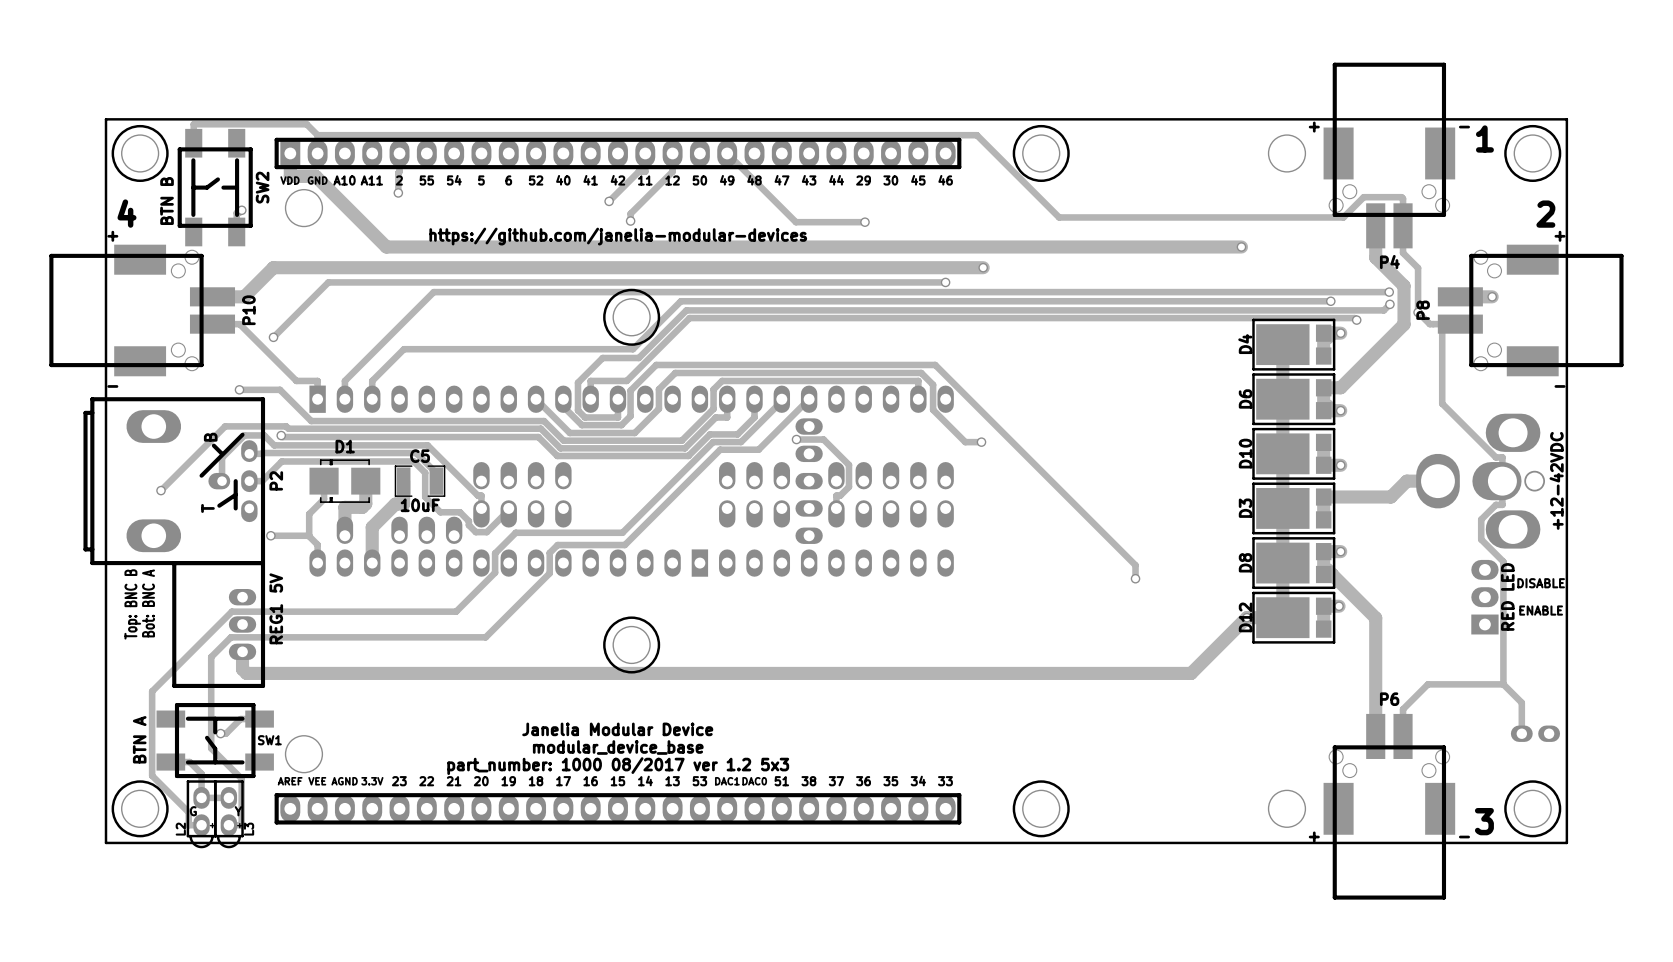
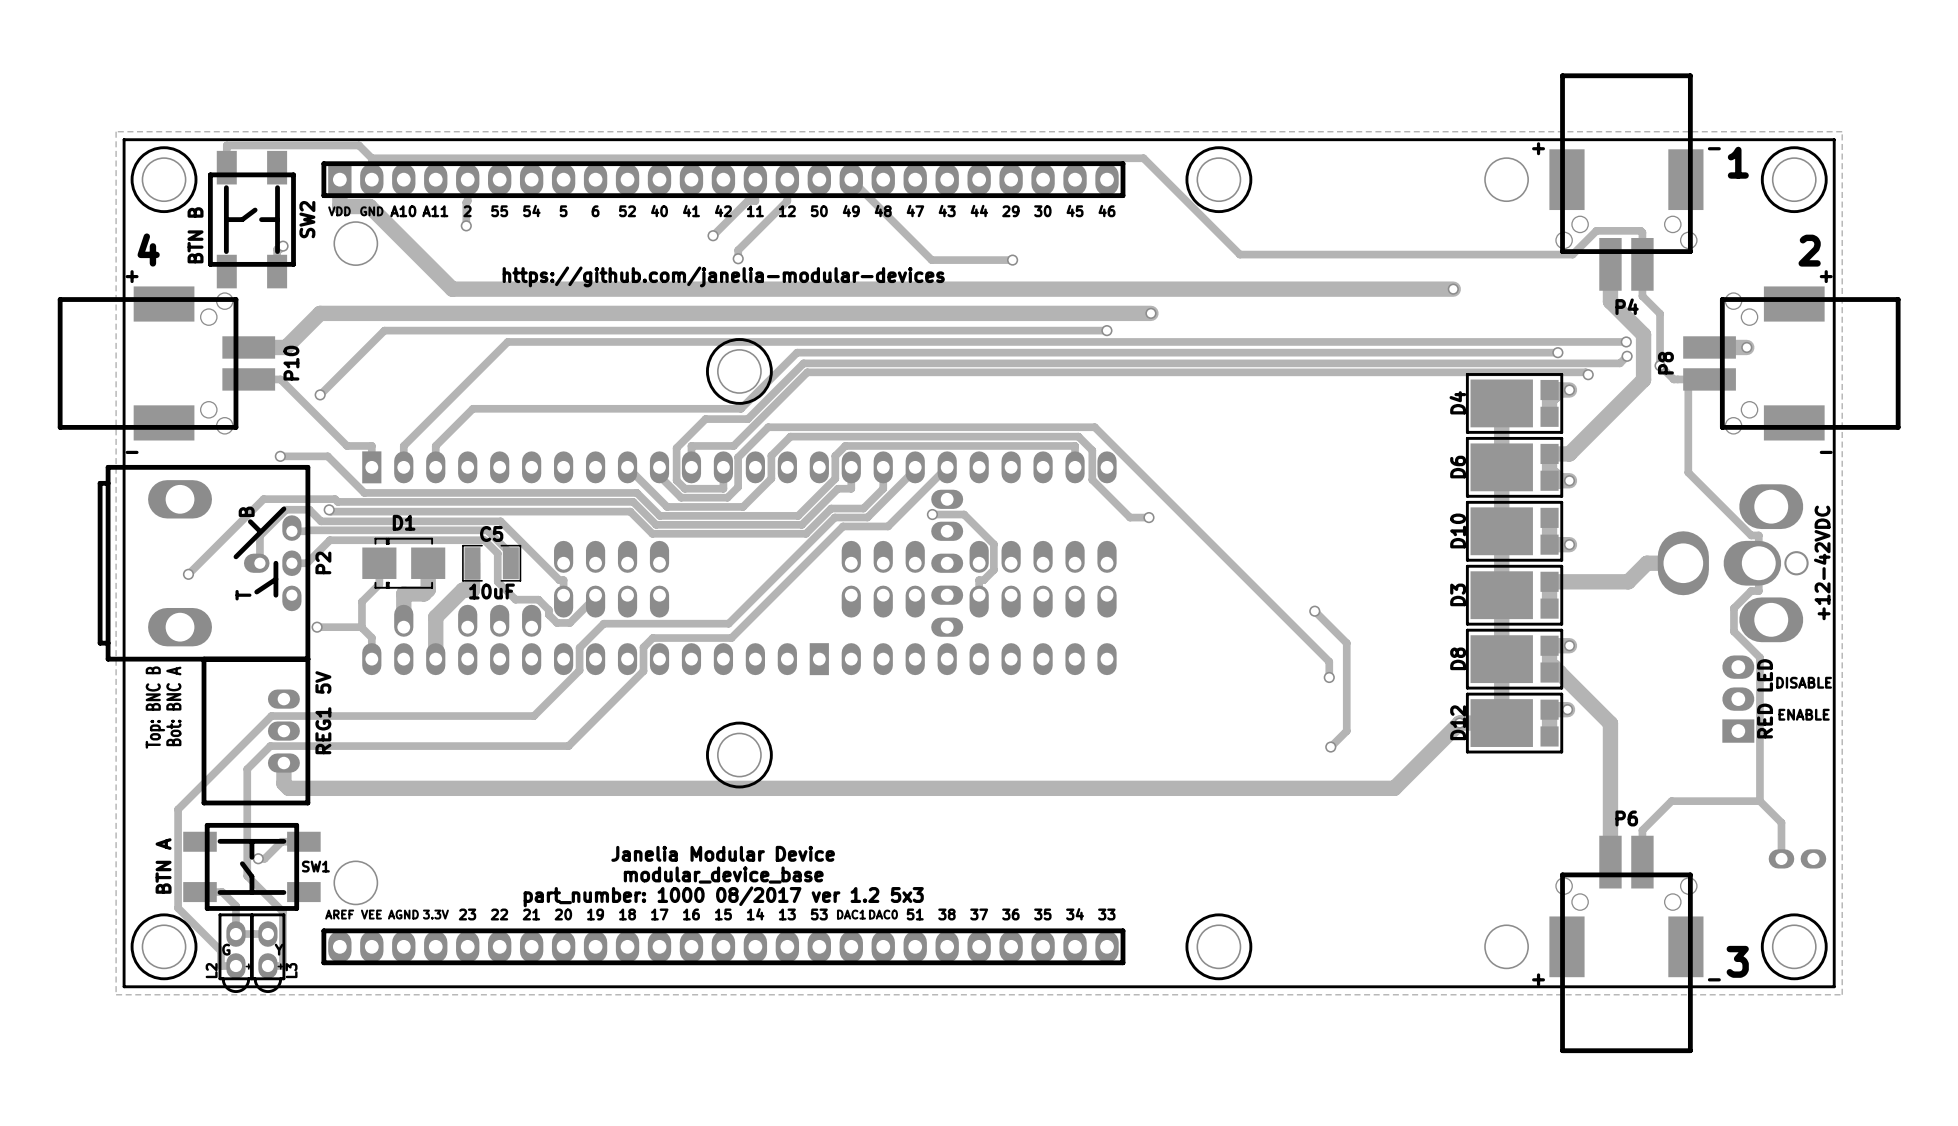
zone outline: none -> (116, 131) (116, 994) (1842, 994) (1842, 131) (116, 131)
track: none -> (1314, 611) (1346, 643) (1346, 731) (1330, 747)
via: none -> (1314, 611)
via: none -> (1330, 747)

